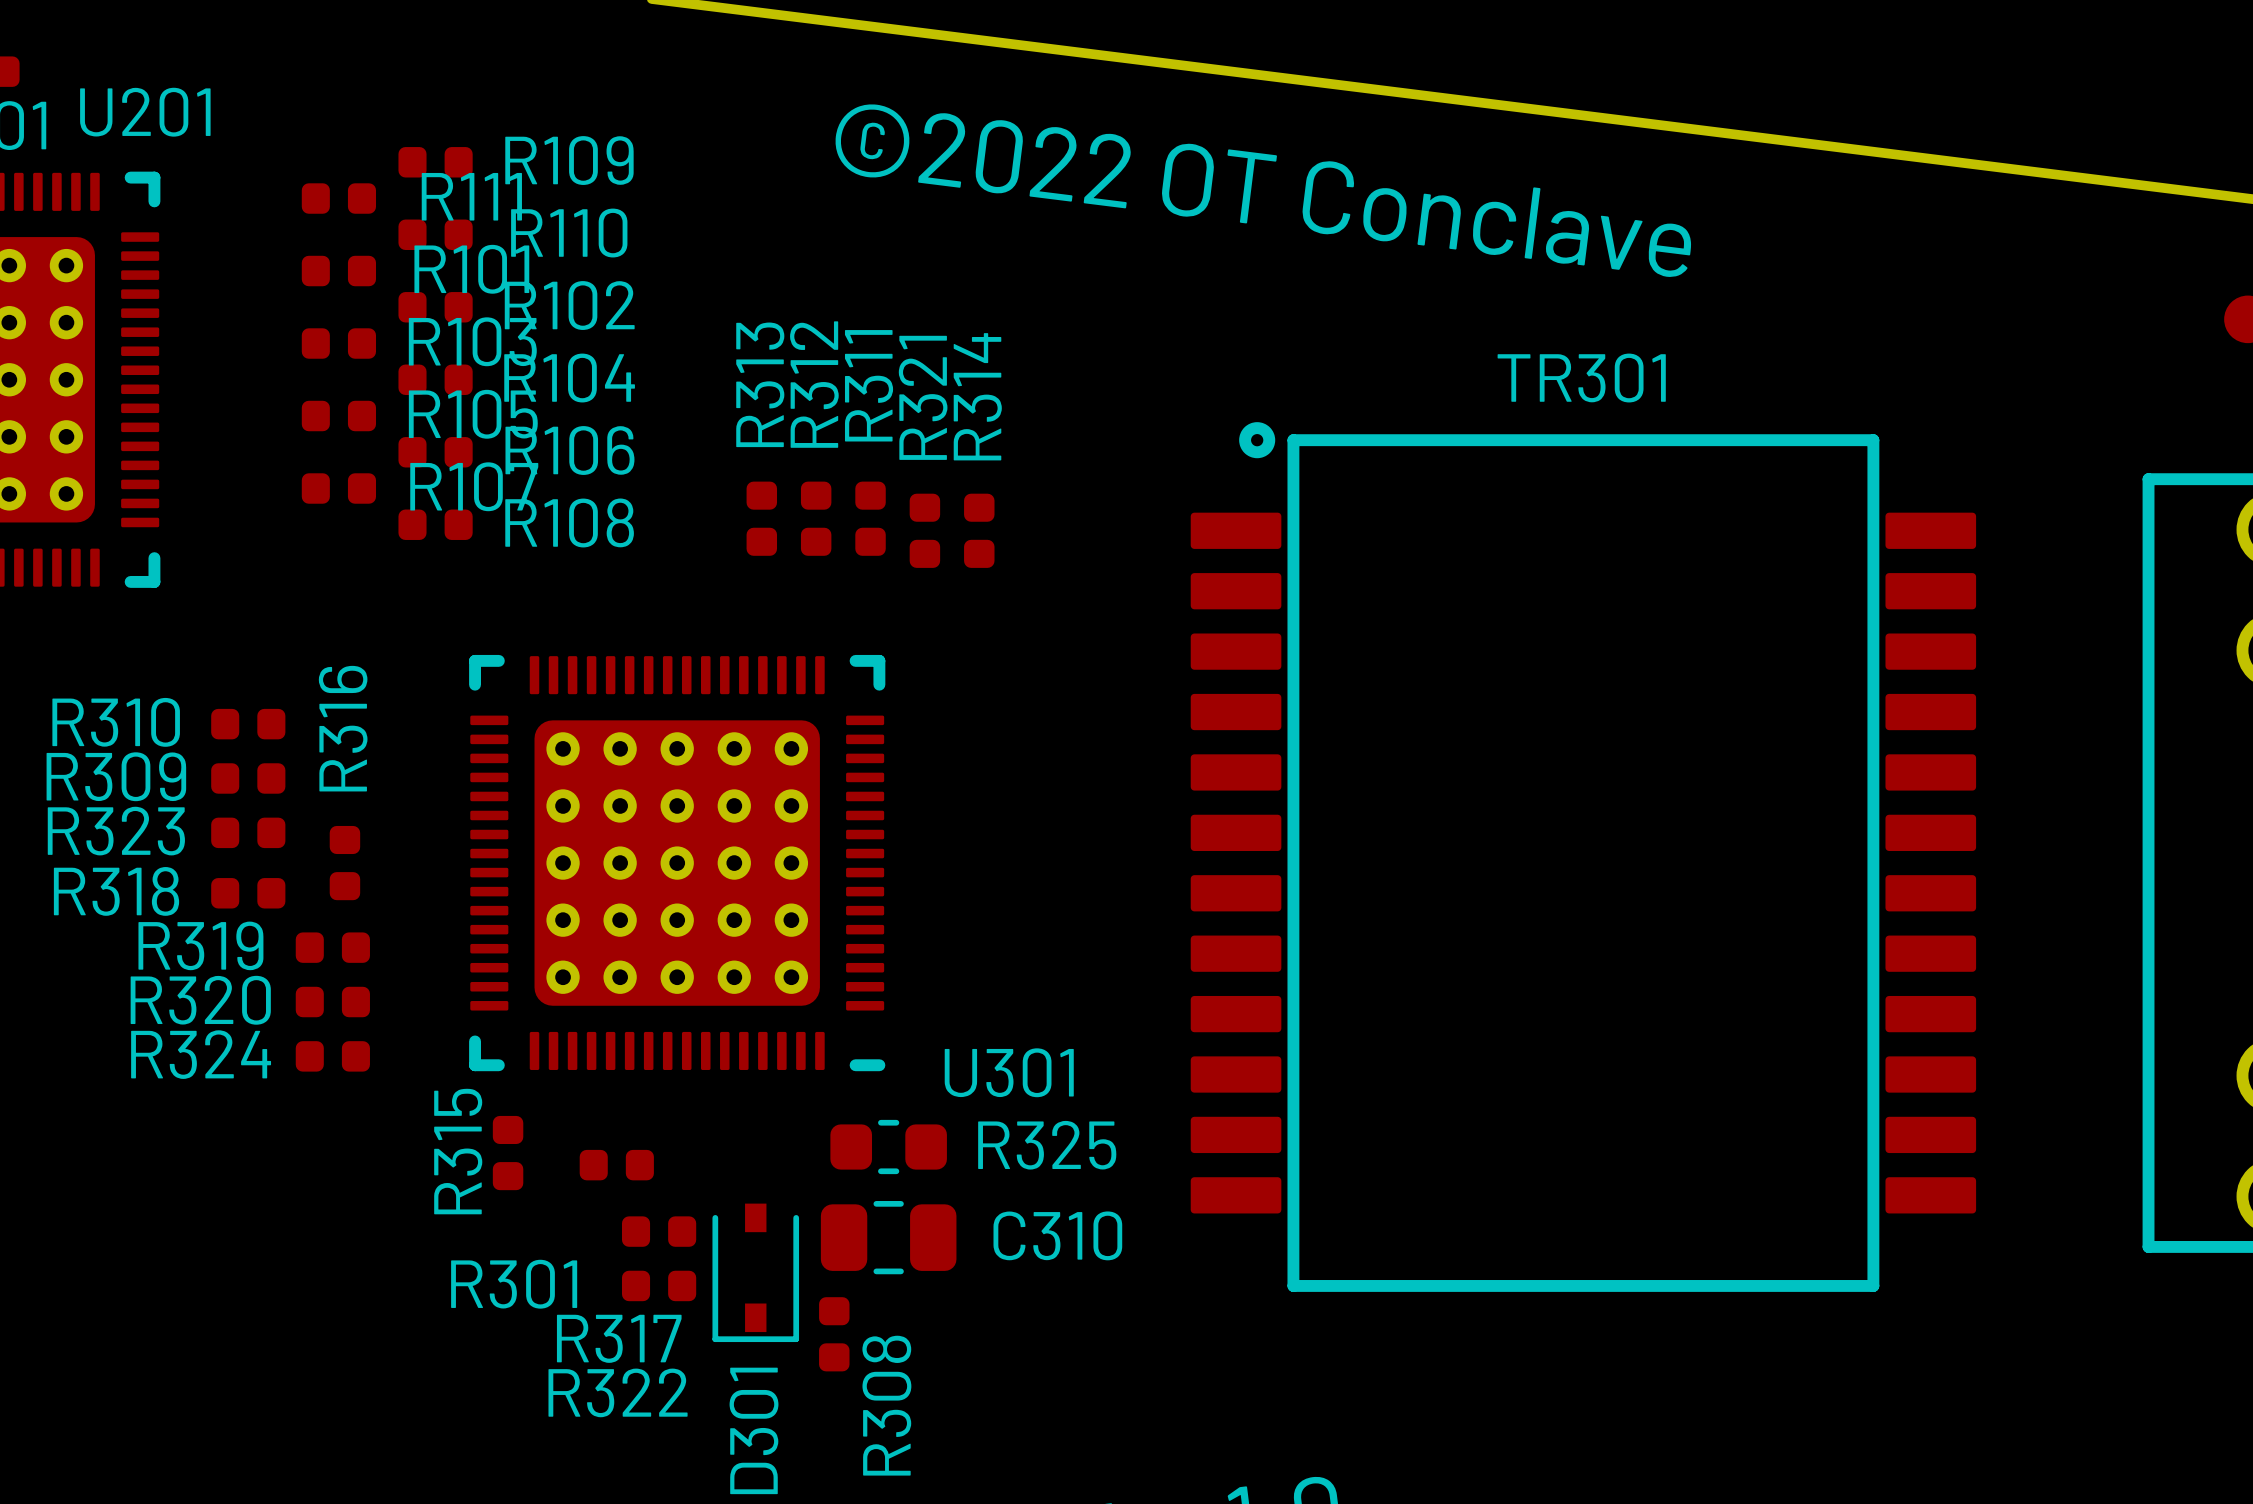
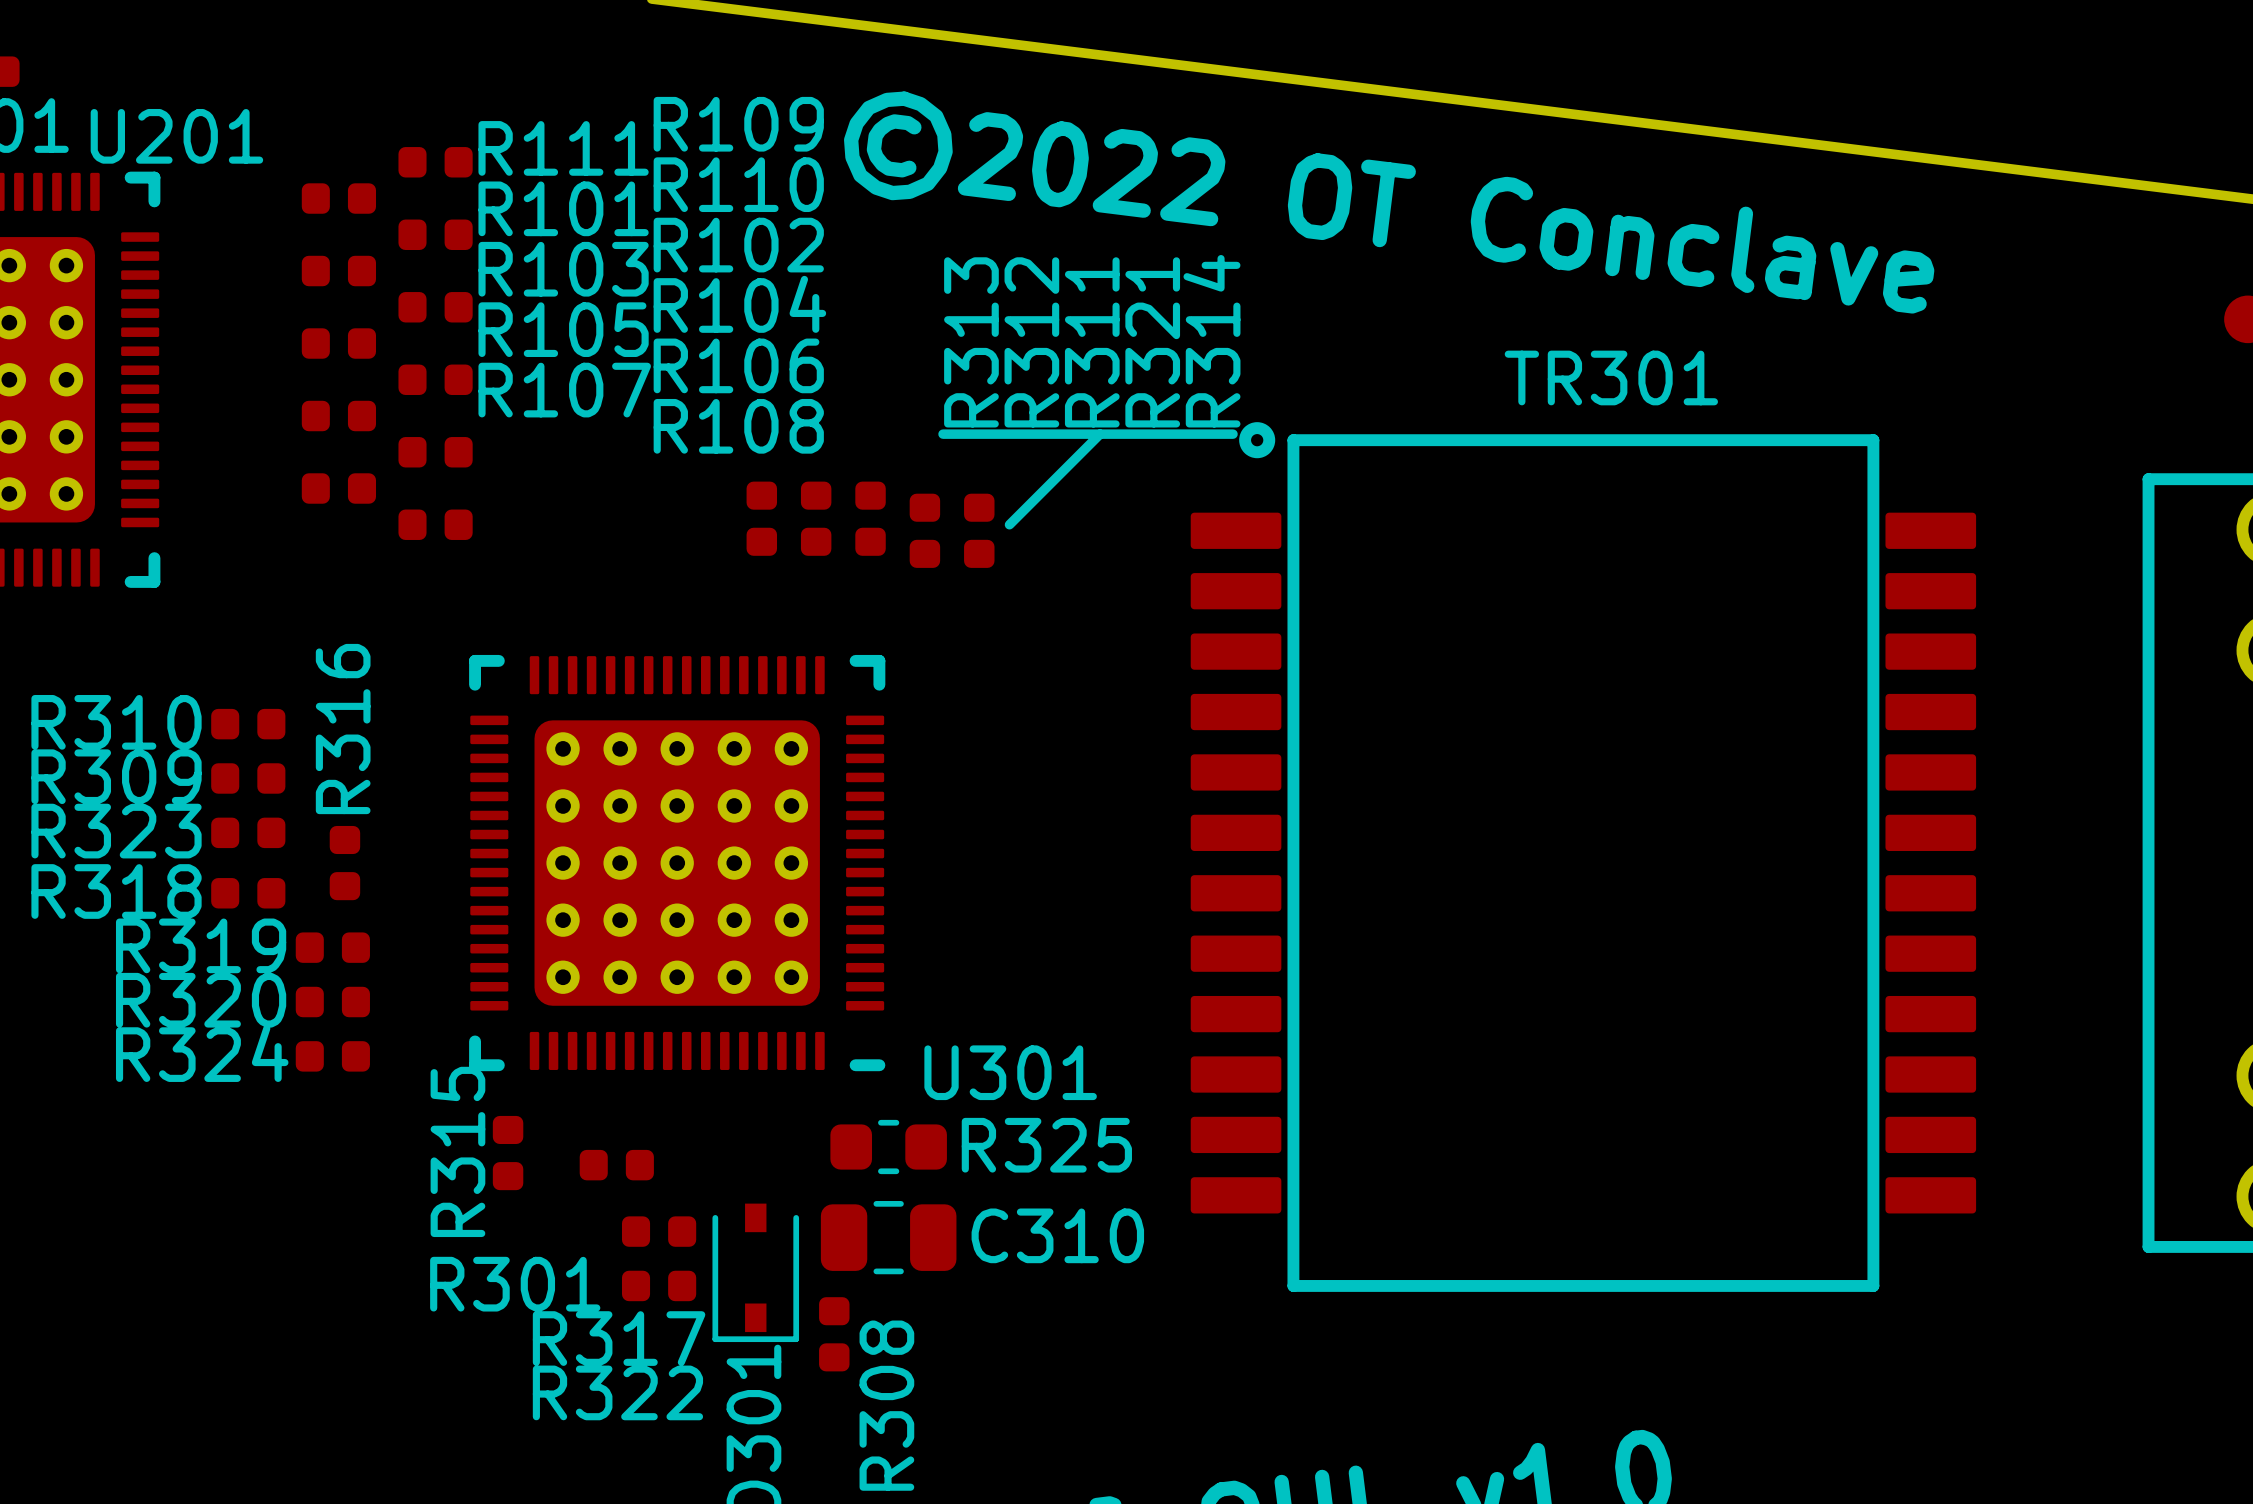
U201 name position: U201 (145, 112) -> U201 (176, 136)
R109 name position: R109 (569, 160) -> R109 (738, 124)
R111 name position: R111 (471, 196) -> R111 (563, 148)
R110 name position: R110 (569, 233) -> R110 (738, 184)
R101 name position: R101 (471, 269) -> R101 (563, 208)
R102 name position: R102 (569, 305) -> R102 (738, 245)
R103 name position: R103 (472, 341) -> R103 (563, 269)
R104 name position: R104 (569, 378) -> R104 (739, 304)
TR301 name position: TR301 (1581, 378) -> TR301 (1611, 377)
R313 name position: R313 (760, 384) -> R313 (971, 342)
R312 name position: R312 (814, 384) -> R312 (1031, 342)
R311 name position: R311 (869, 385) -> R311 (1092, 342)
R314 name position: R314 (977, 396) -> R314 (1211, 341)
R321 name position: R321 (923, 397) -> R321 (1152, 342)
R105 name position: R105 (473, 414) -> R105 (563, 329)
line: none -> (943, 434) (1233, 434)
line: none -> (1100, 434) (1009, 524)
R106 name position: R106 (569, 450) -> R106 (738, 365)
R107 name position: R107 (474, 486) -> R107 (564, 390)
R108 name position: R108 (569, 522) -> R108 (738, 426)

